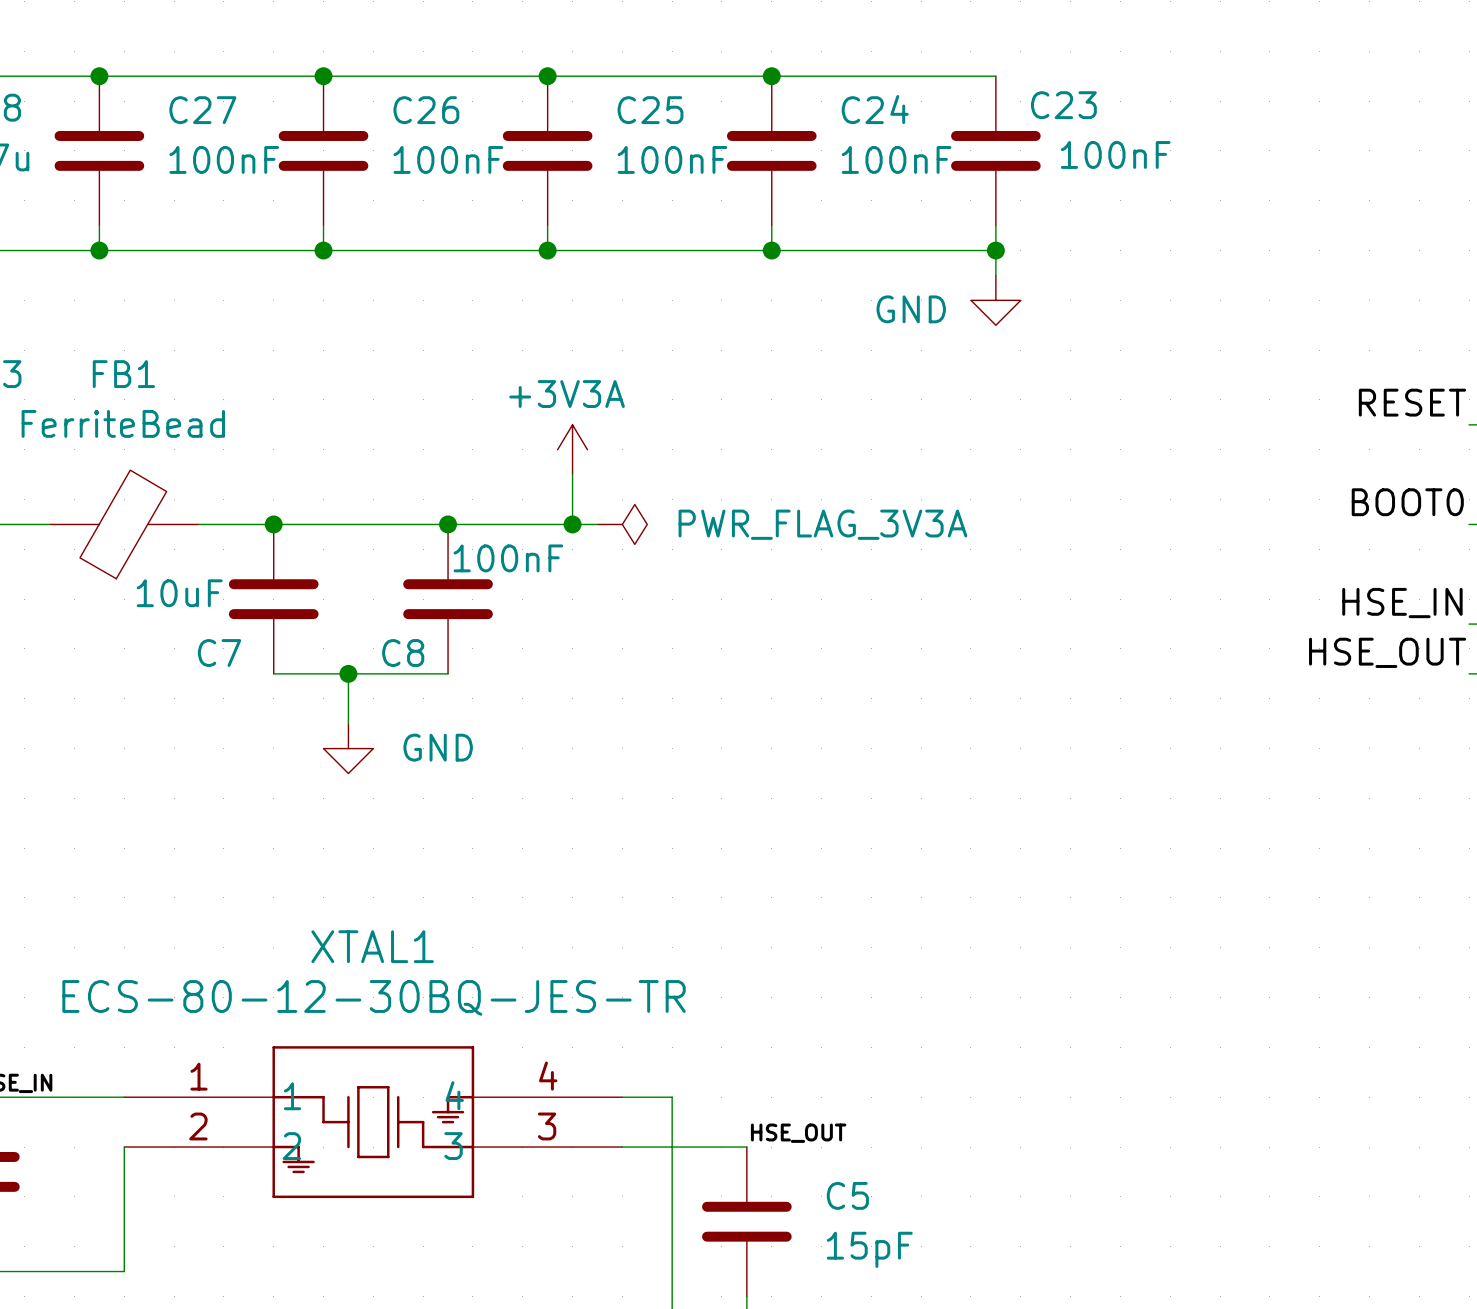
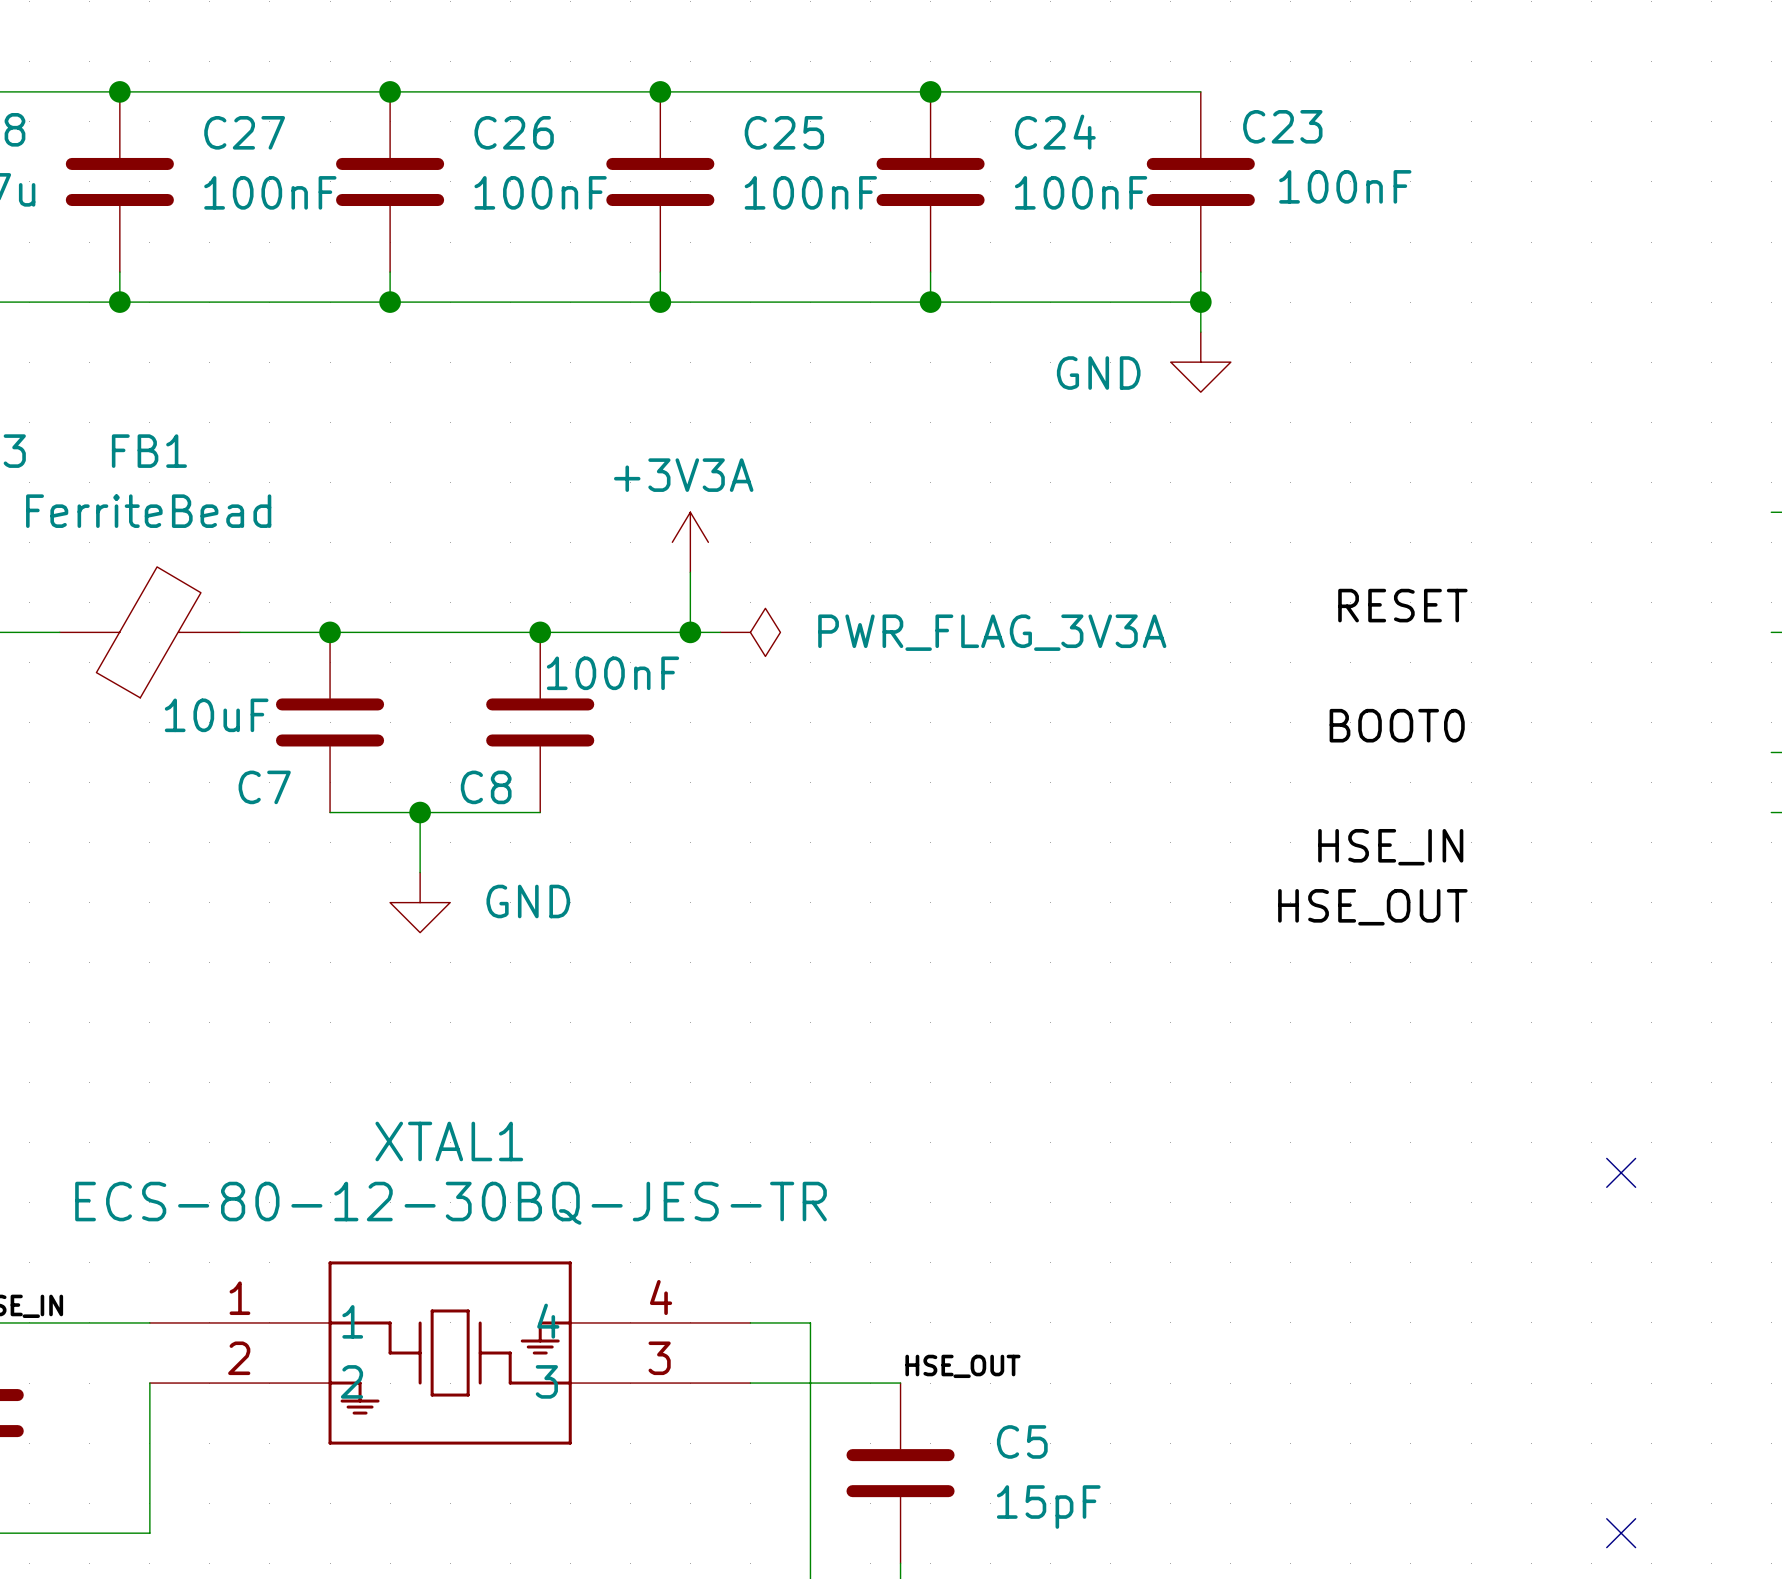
label position: RESET (1412, 402) -> RESET (1402, 605)
label position: BOOT0 (1407, 502) -> BOOT0 (1397, 725)
label position: HSE_IN (1402, 603) -> HSE_IN (1390, 847)
label position: HSE_OUT (1387, 652) -> HSE_OUT (1372, 907)
no-connect mark: none -> (1621, 1172)
no-connect mark: none -> (1621, 1533)

